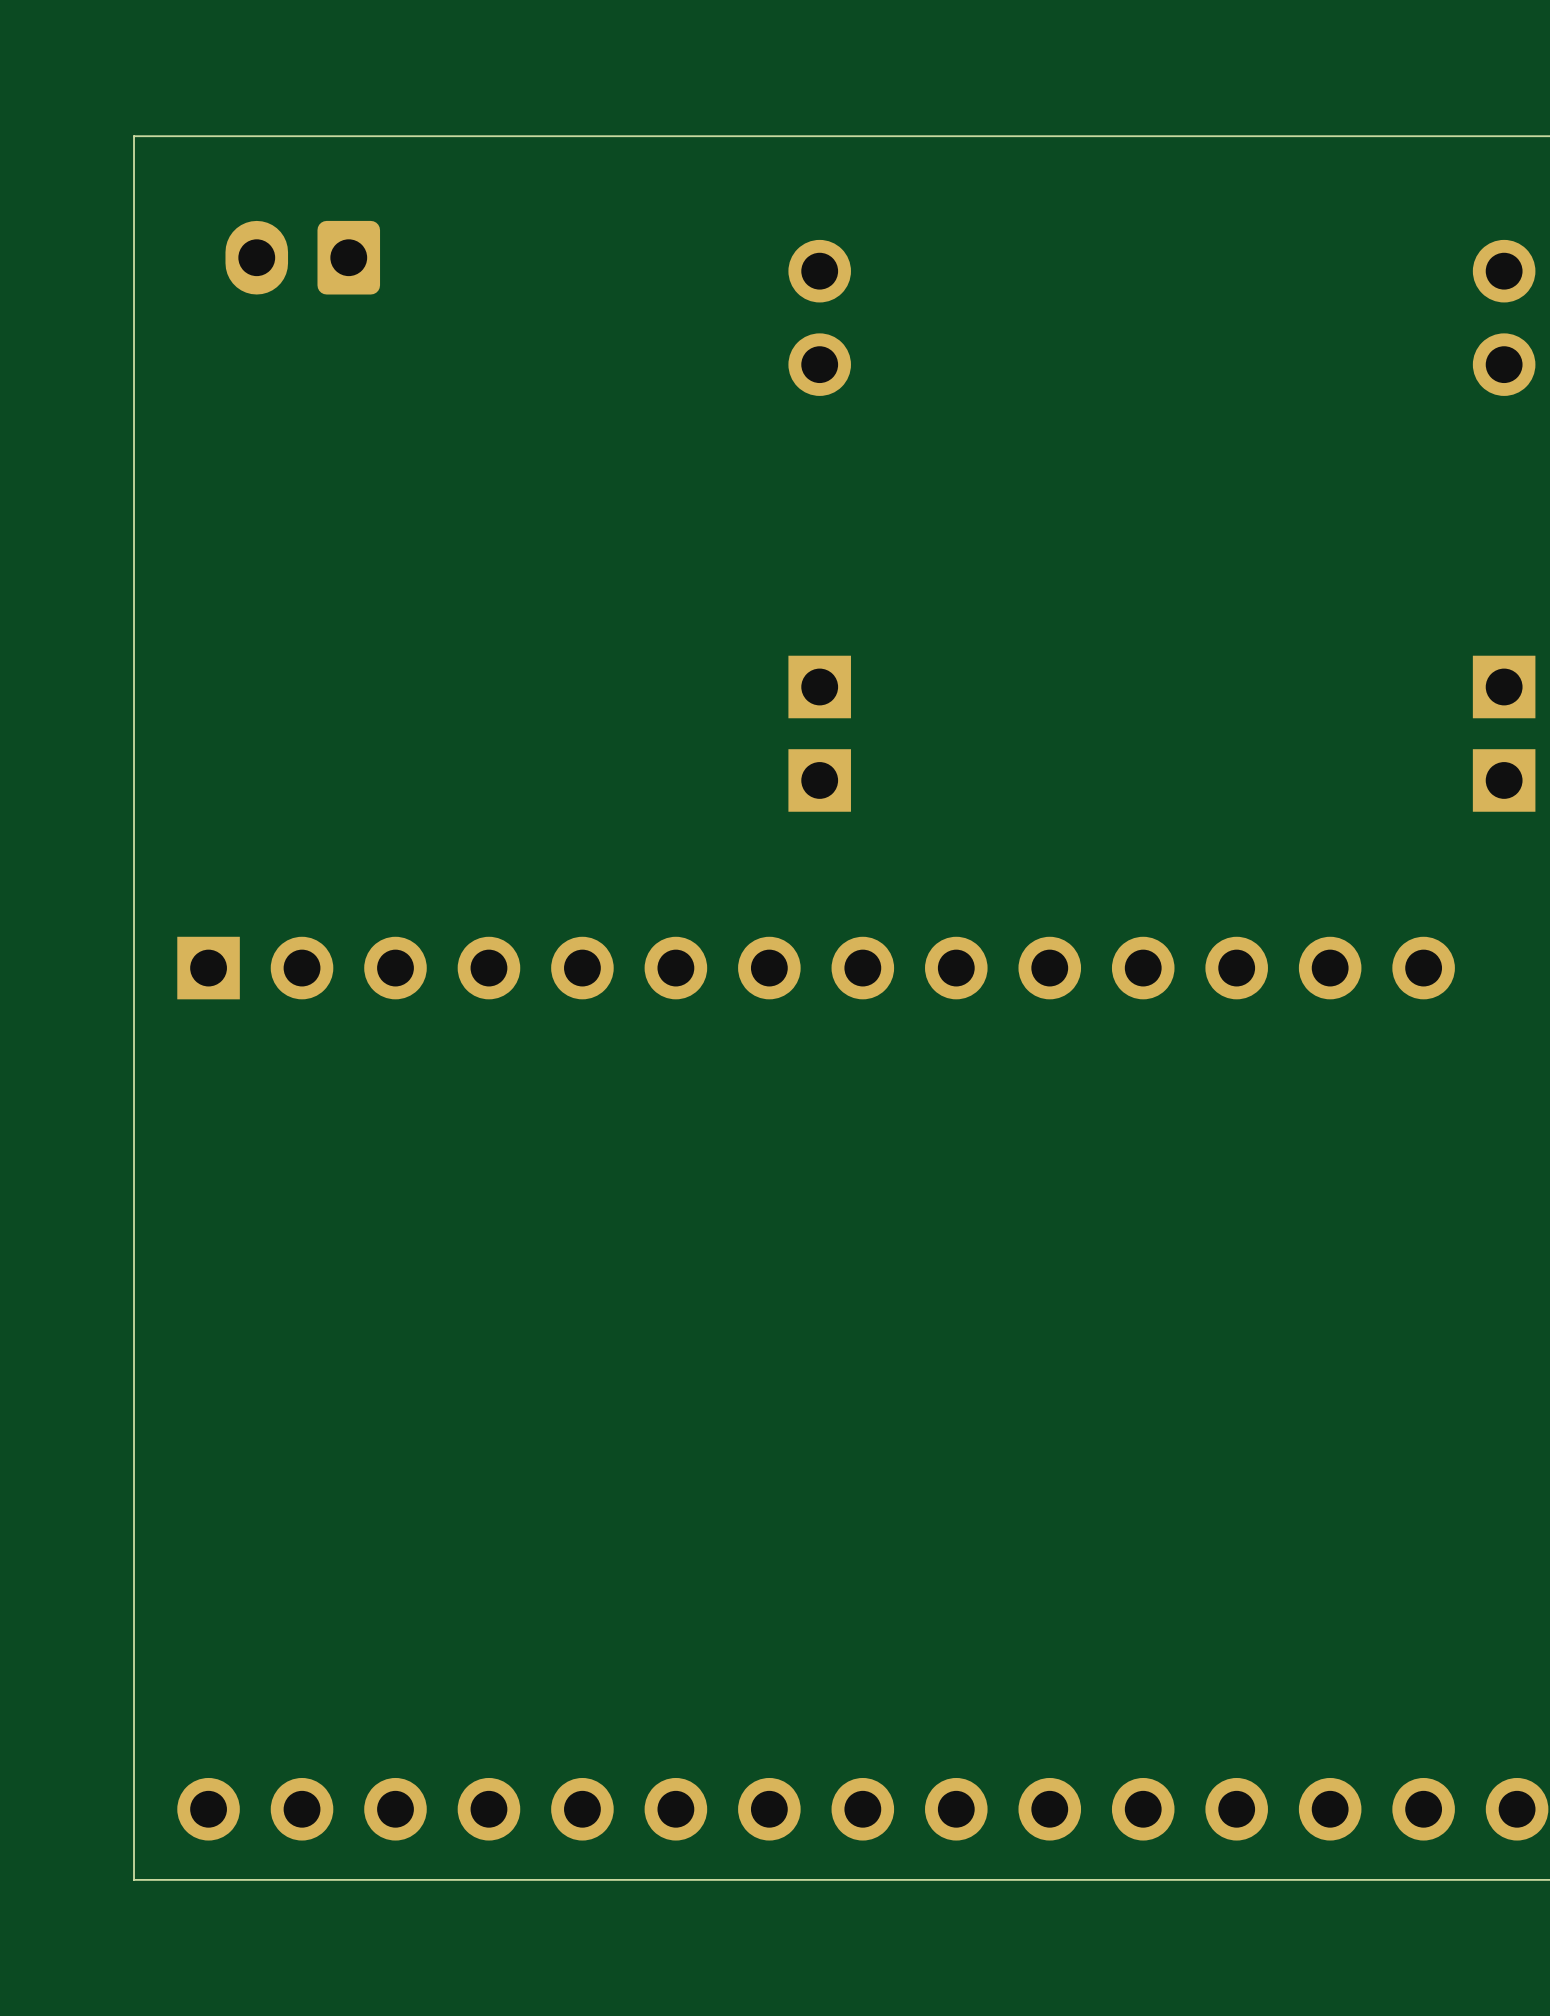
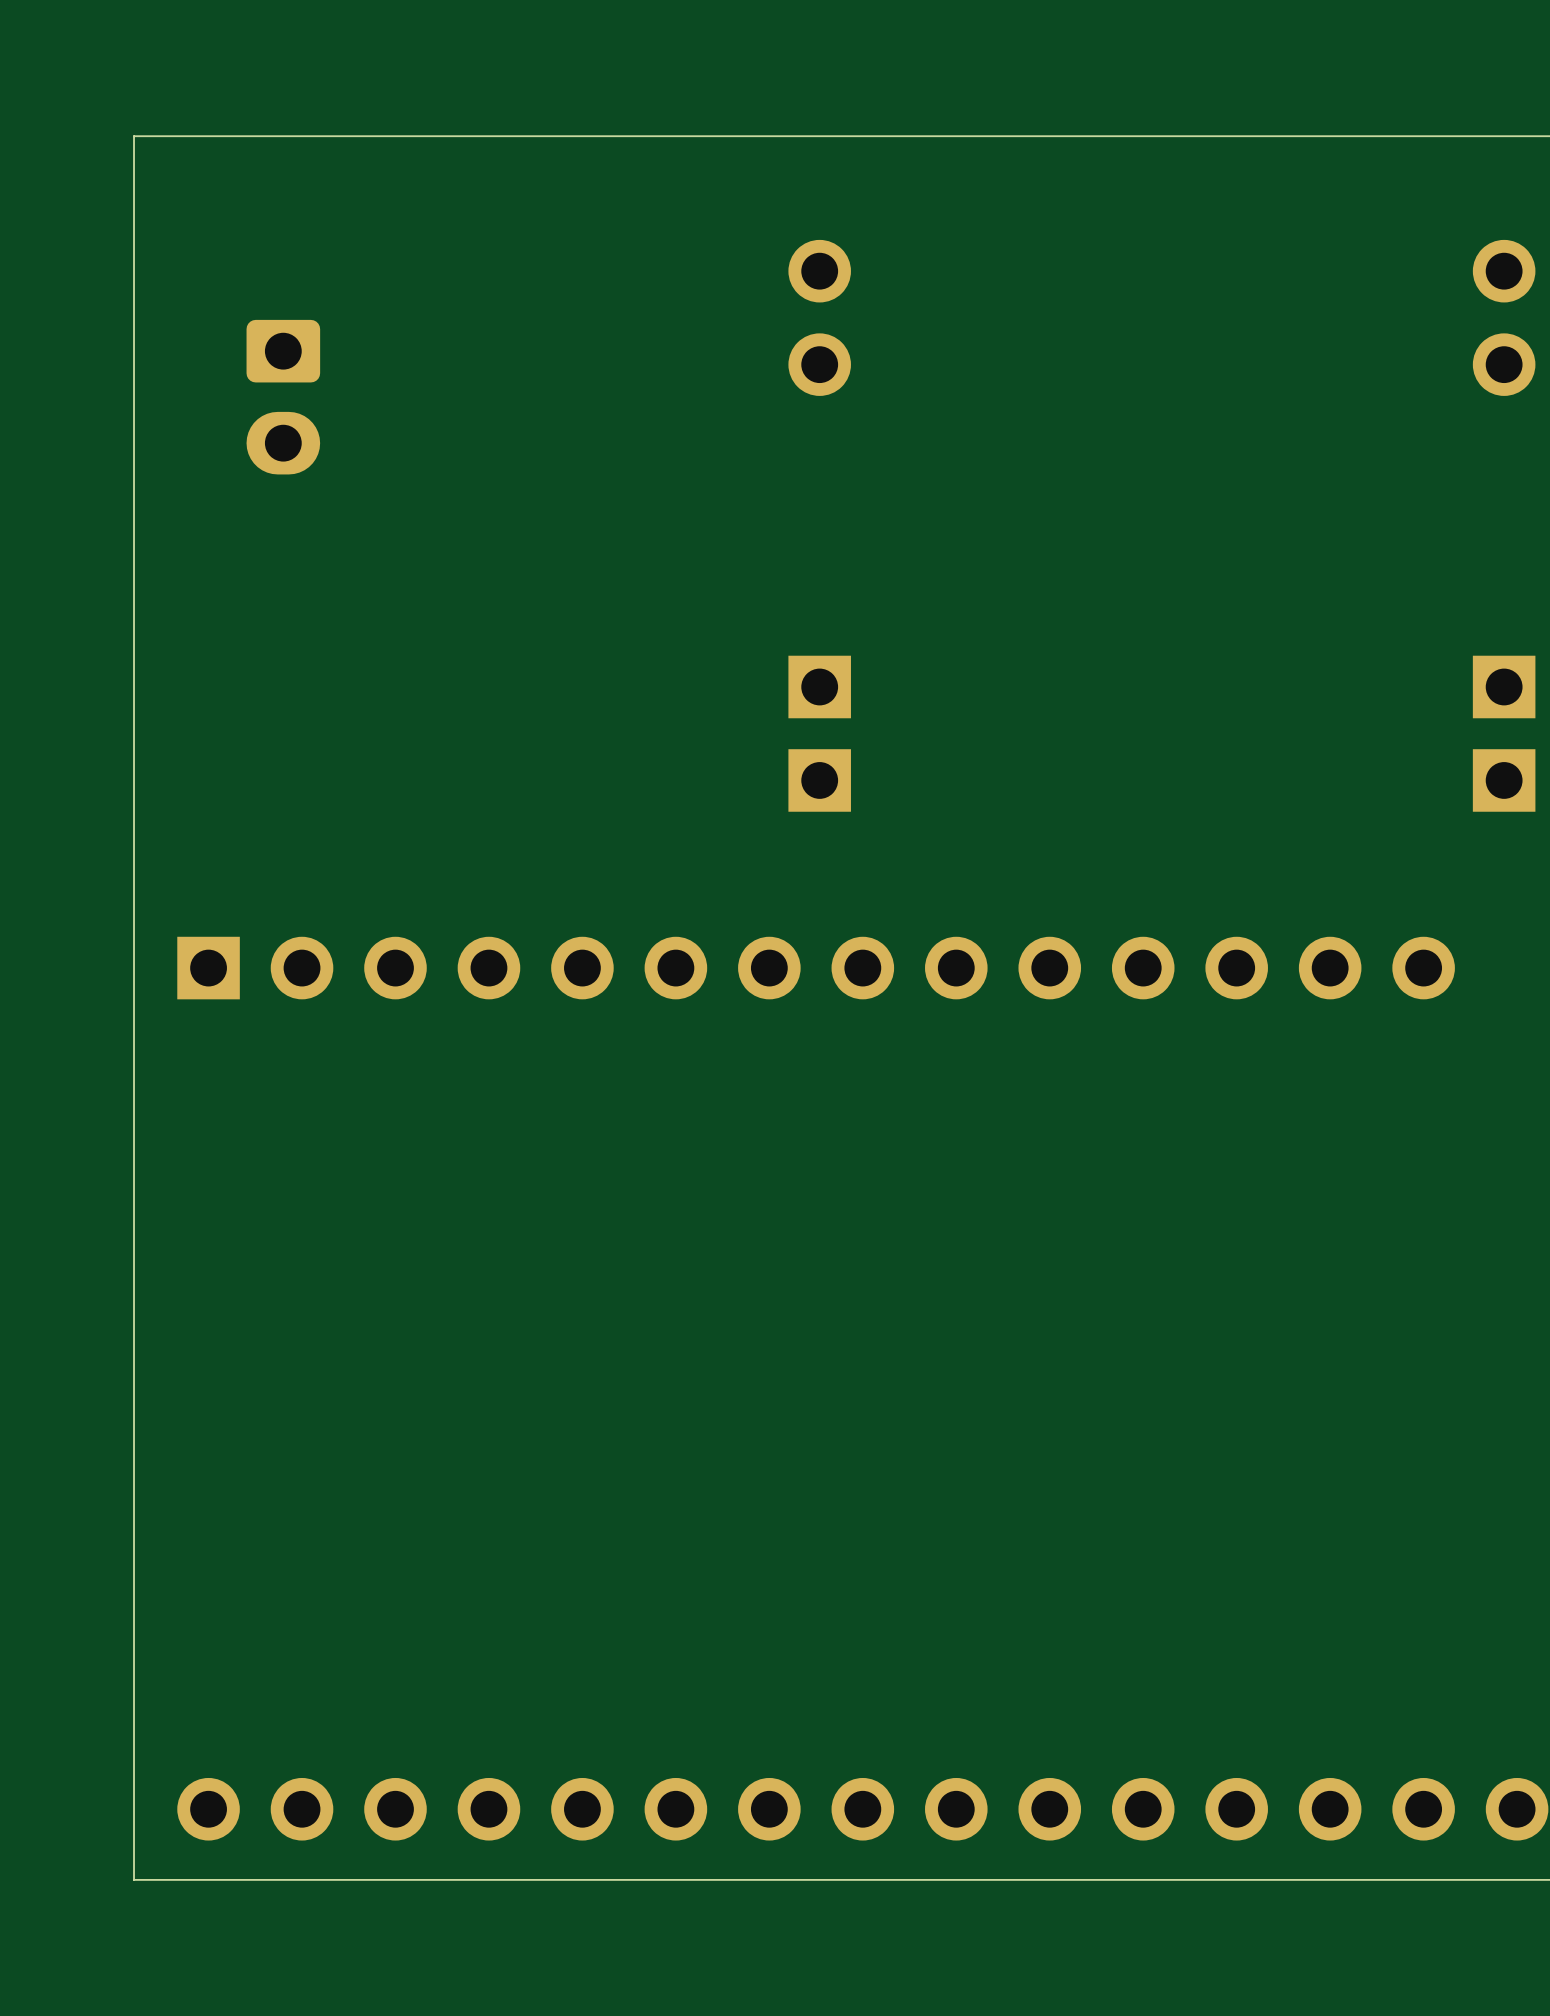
part rotation: 0° (302, 257) -> 90° counterclockwise (283, 397)
part position: (302, 257) -> (283, 397)

